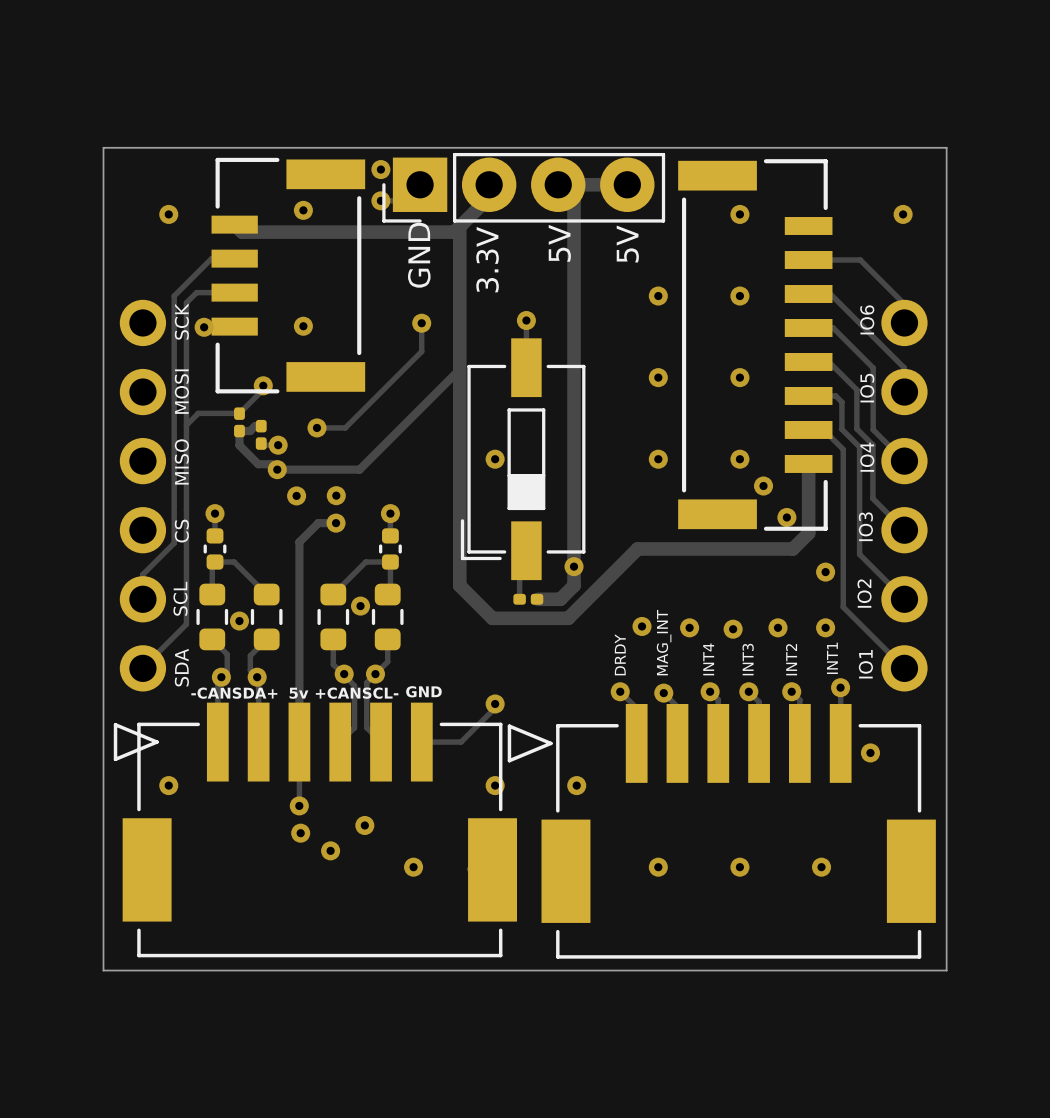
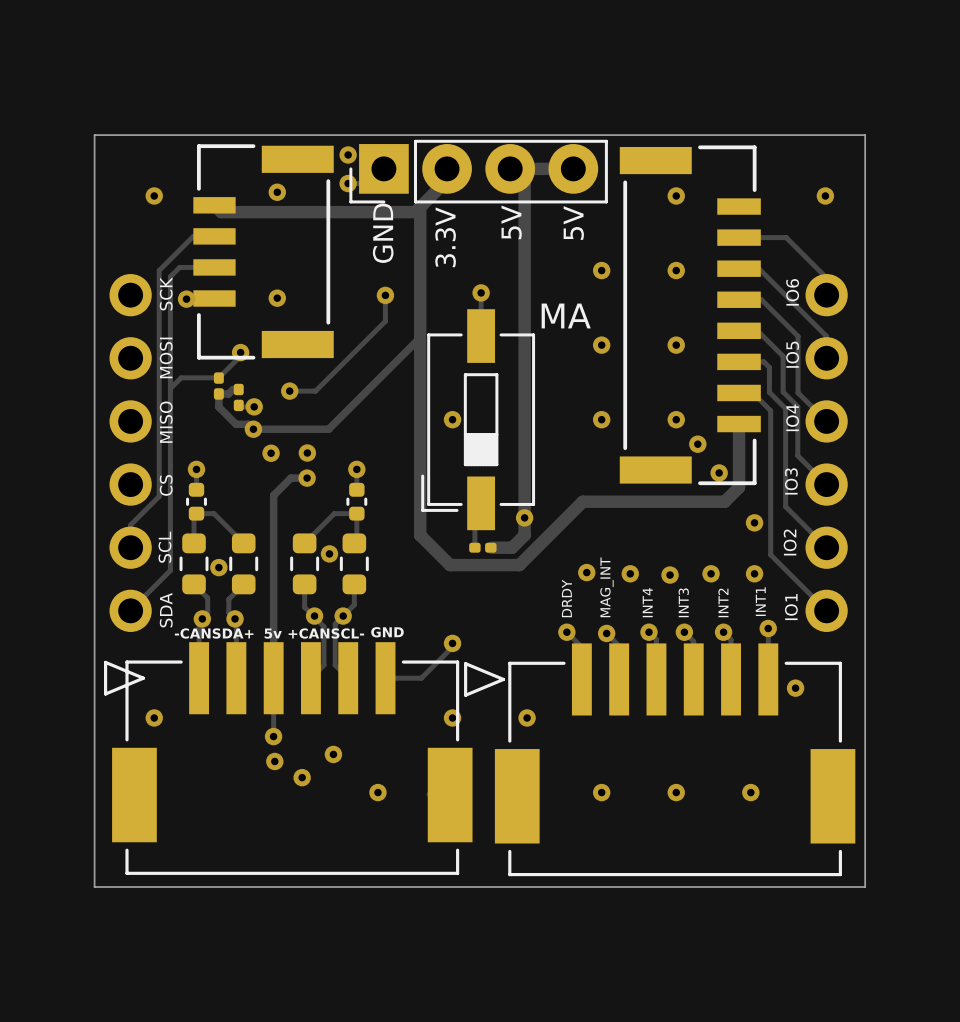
text: none -> MA (566, 315)

